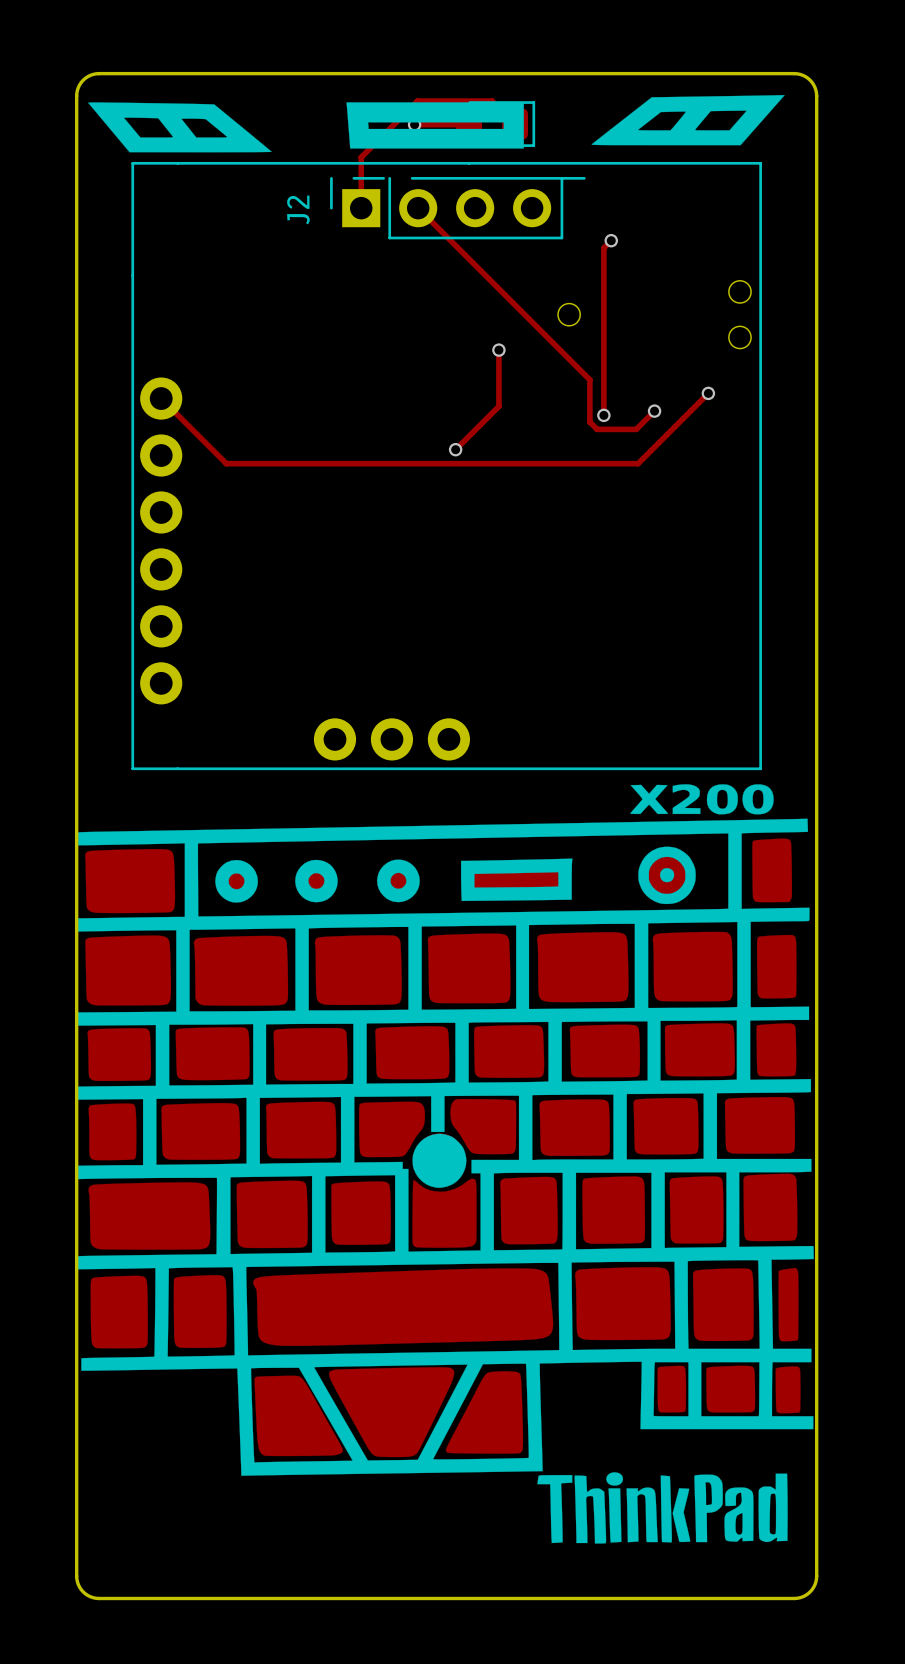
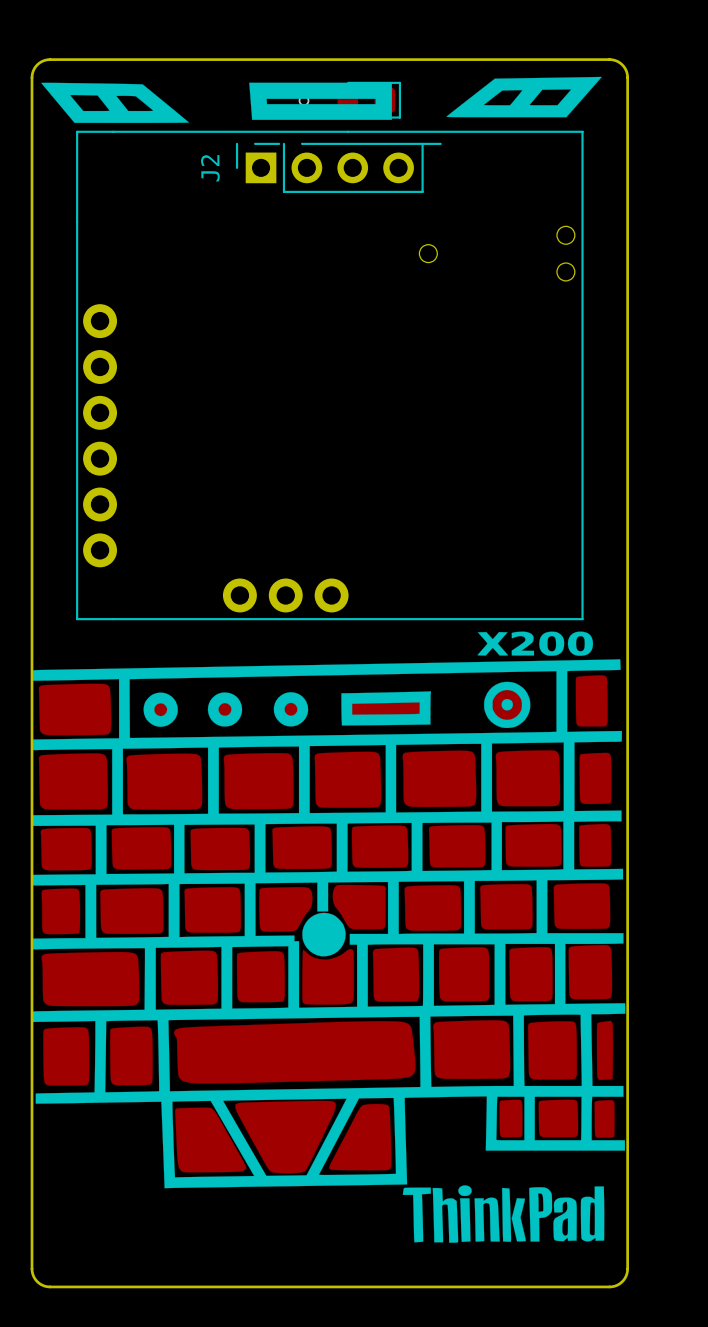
track: (469, 124) (414, 124) -> none
track: (515, 124) (492, 101) (417, 101) (361, 157) (361, 208) -> none
track: (418, 208) (589, 379) (589, 422) (597, 429) (636, 429) (654, 411) -> none
track: (611, 240) (603, 248) (603, 415) -> none
via: (611, 240) -> none
track: (498, 350) (498, 406) (455, 449) -> none
via: (498, 350) -> none
track: (708, 393) (638, 463) (226, 463) (161, 398) -> none
via: (708, 393) -> none
via: (654, 411) -> none
via: (603, 415) -> none
via: (455, 449) -> none

